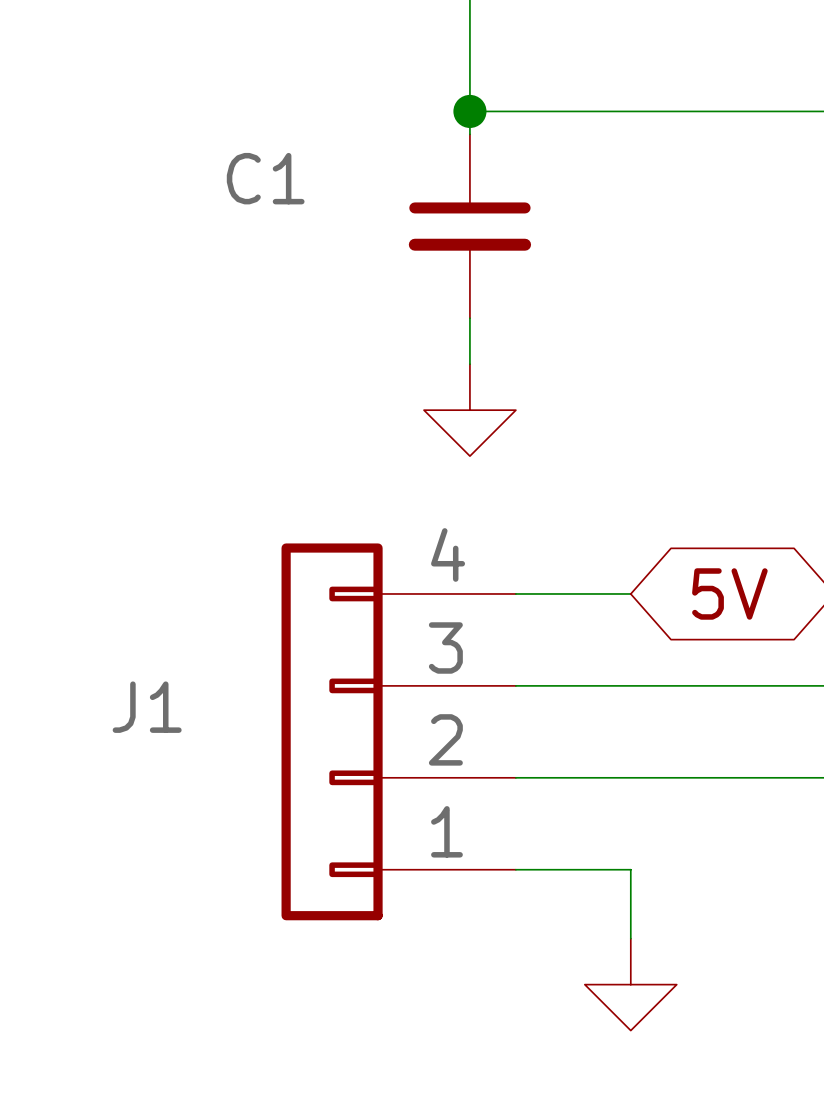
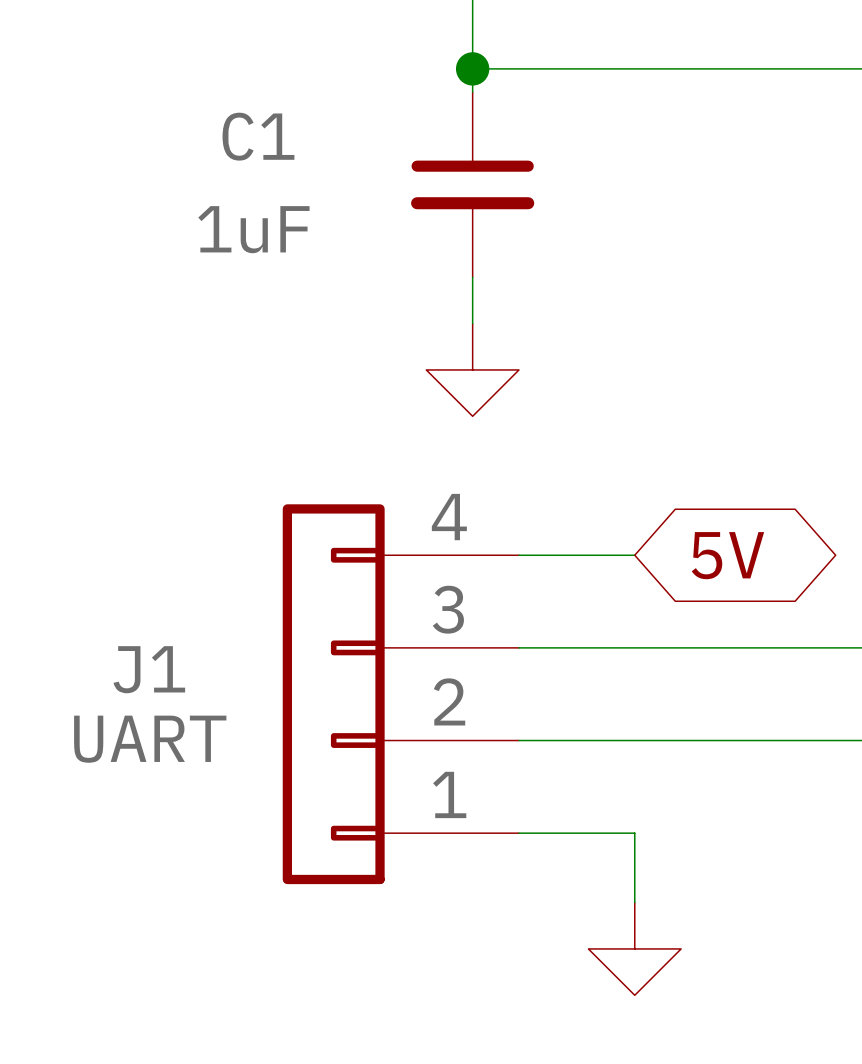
C1 value: none -> 1uF (253, 229)
J1 value: none -> UART (150, 739)

